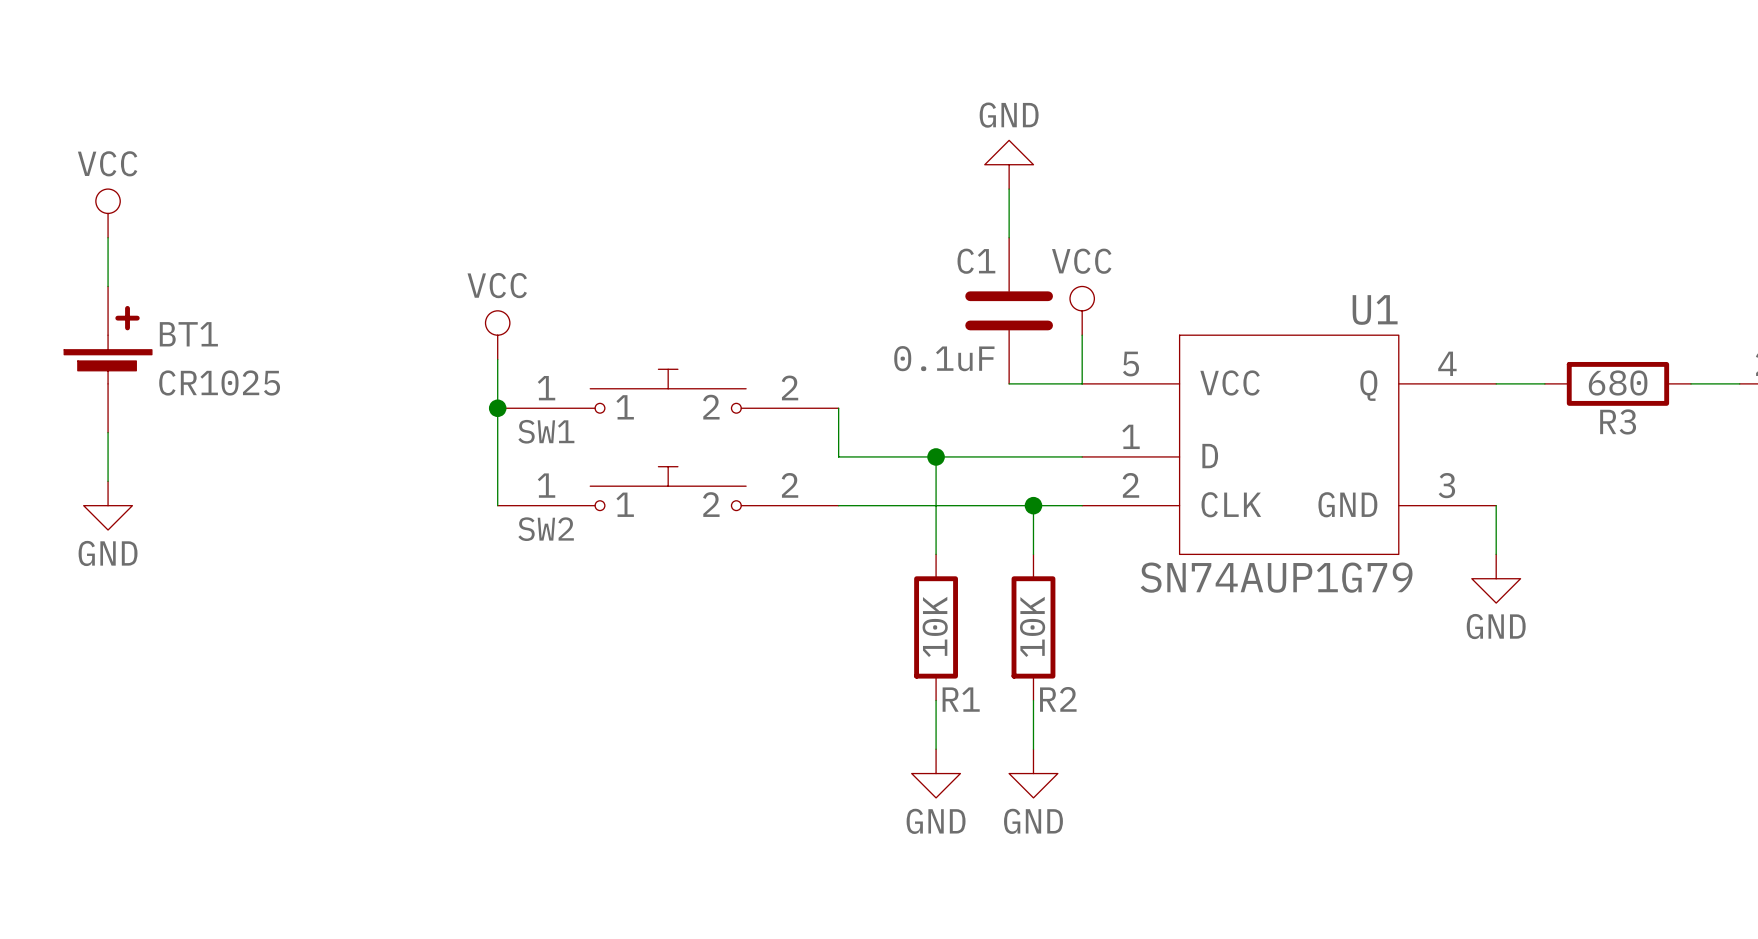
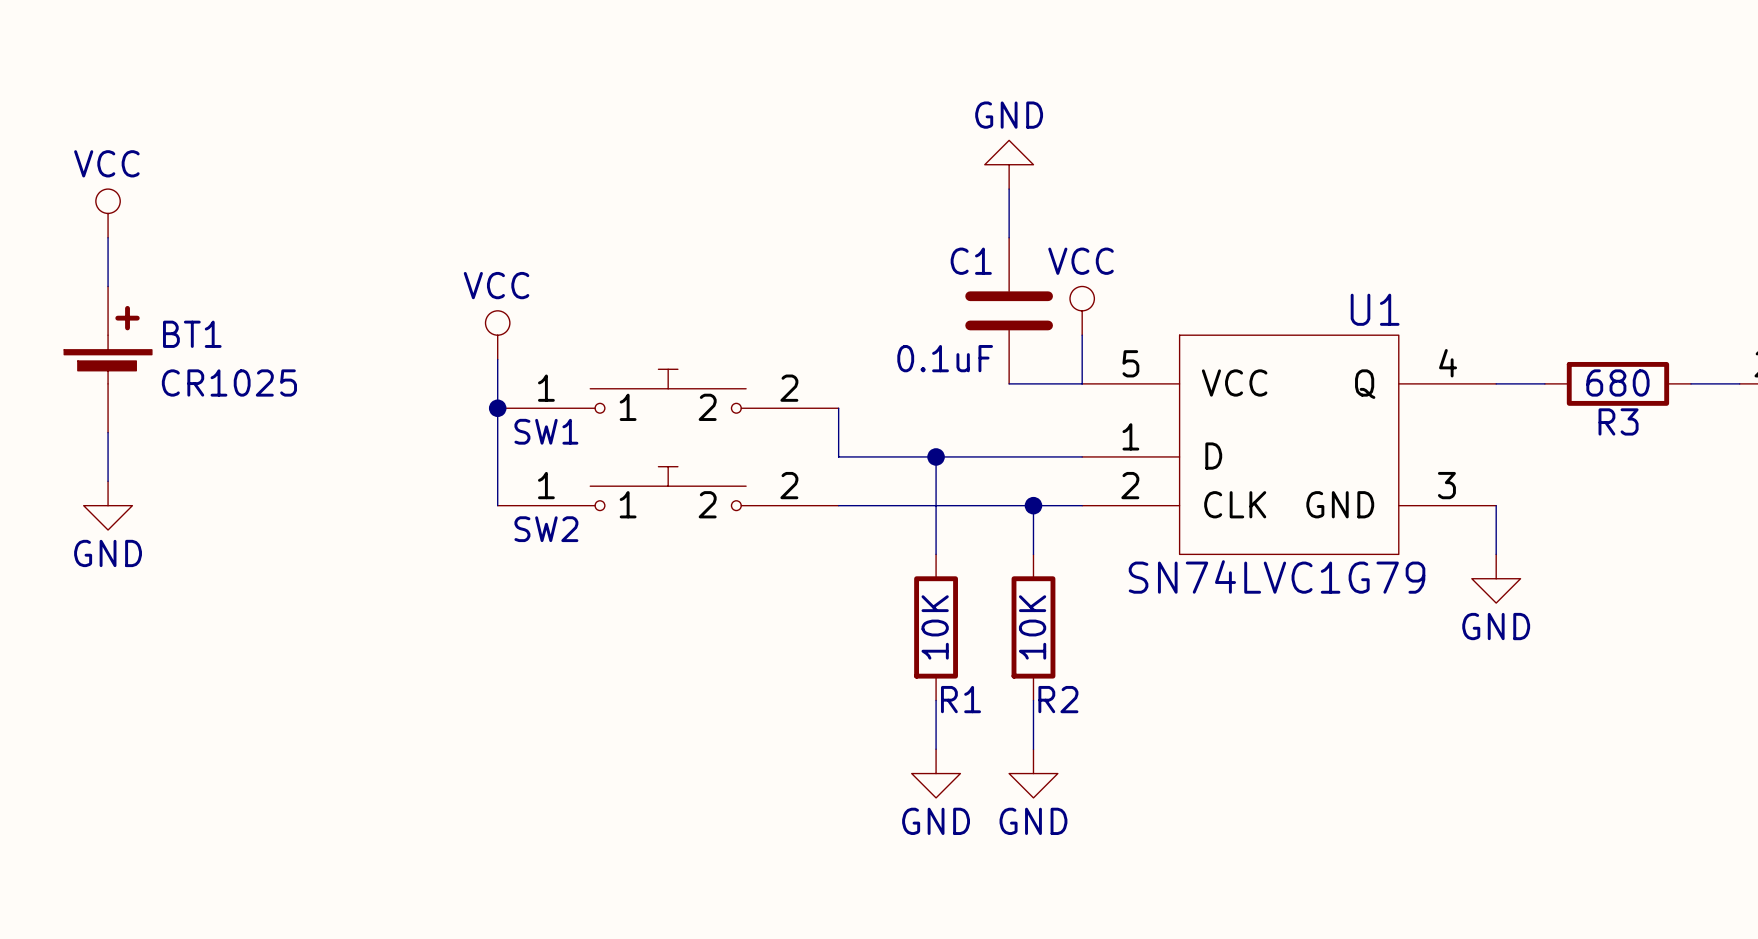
U1 value: SN74AUP1G79 (1276, 577) -> SN74LVC1G79 (1277, 576)

